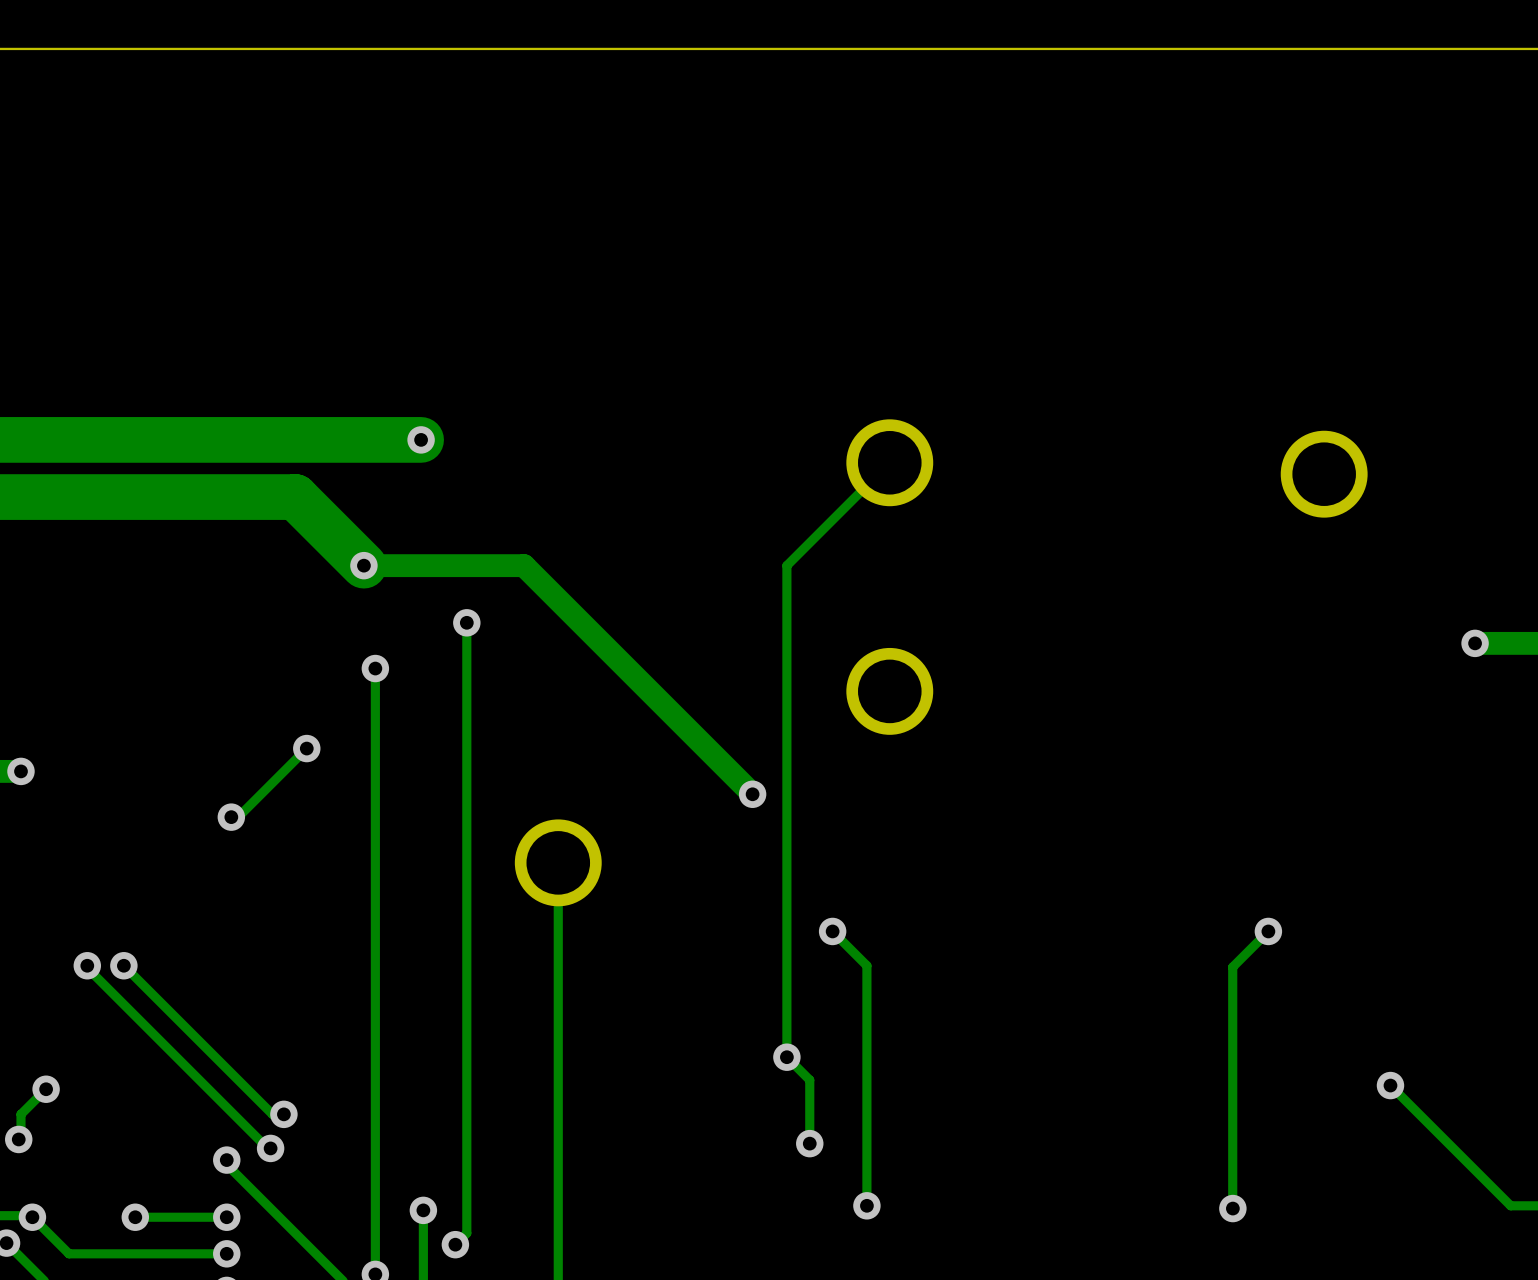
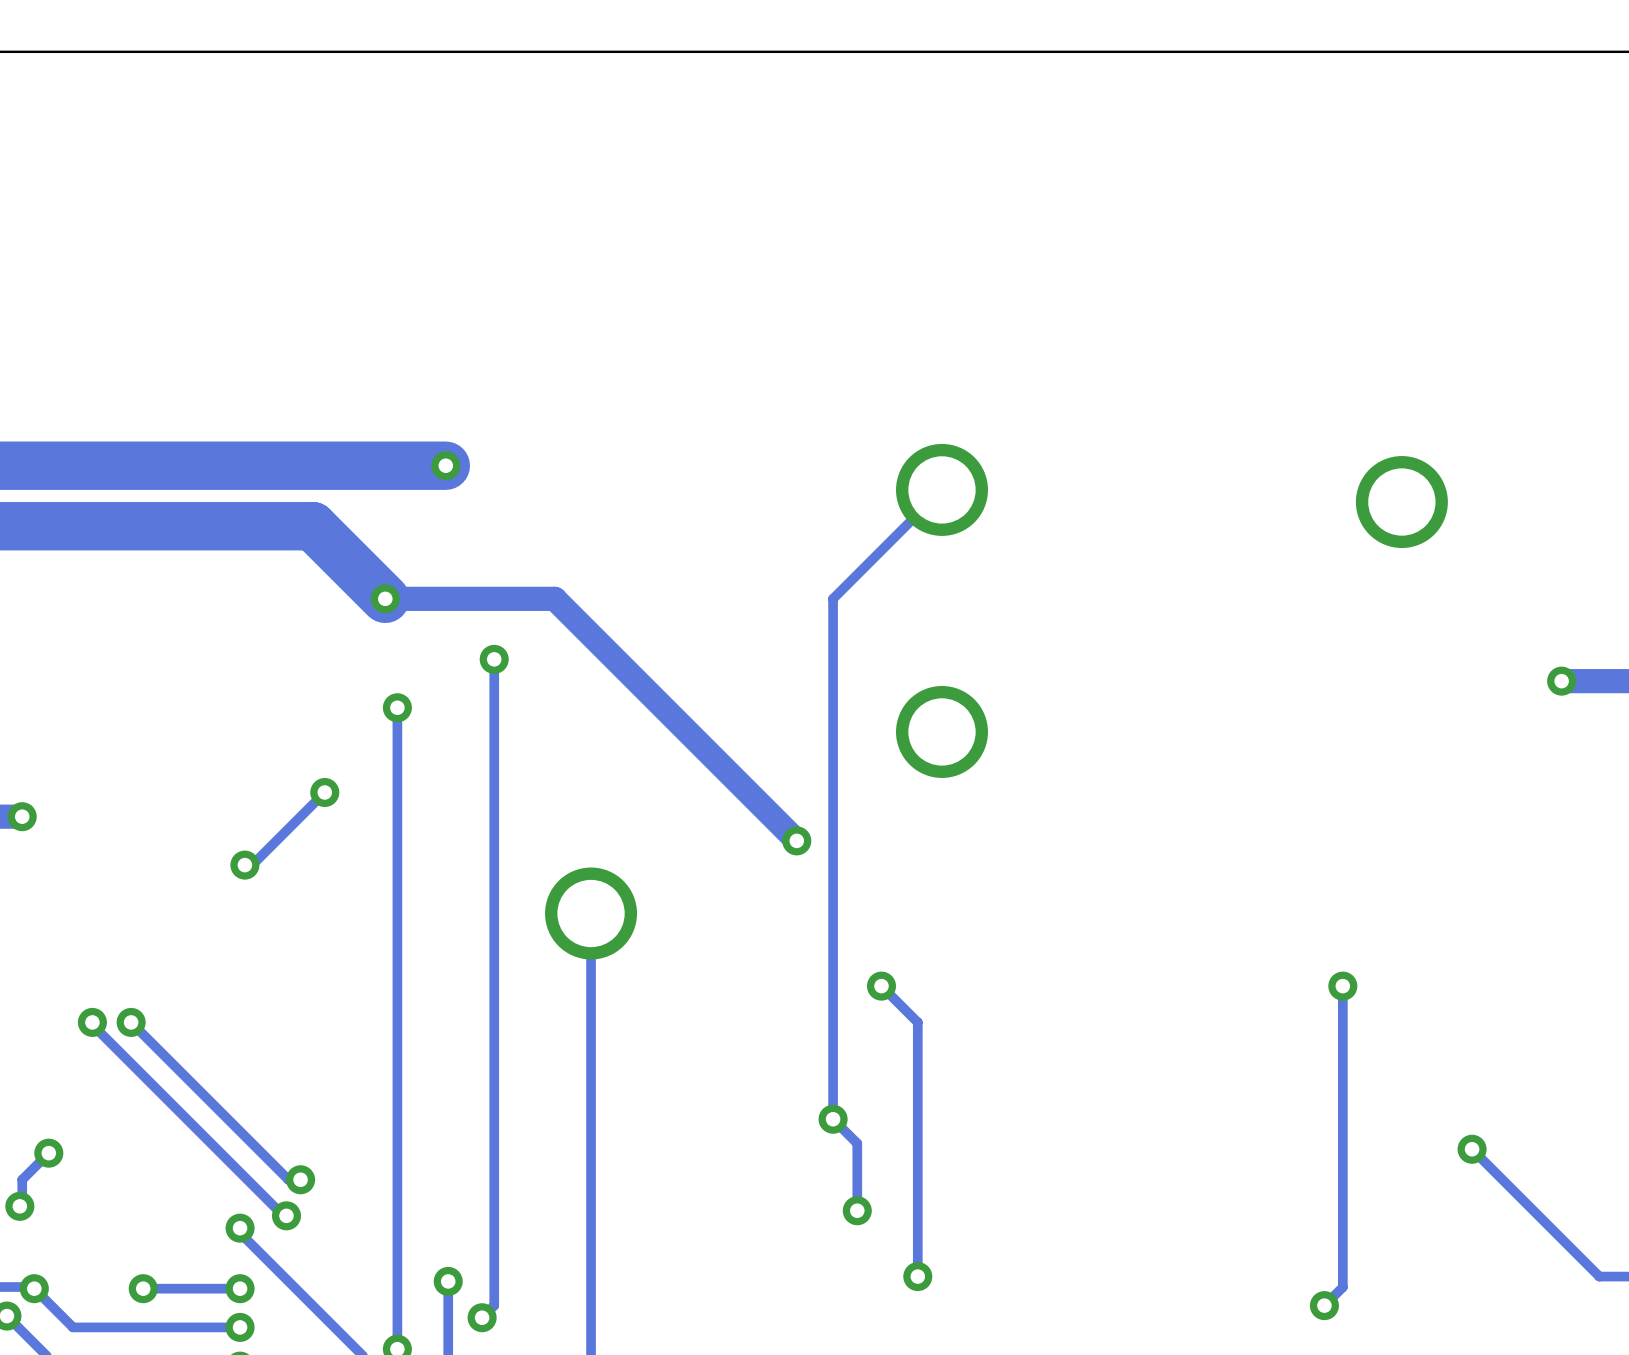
track: (1268, 931) (1232, 967) (1232, 1208) -> (1342, 986) (1342, 1287) (1324, 1305)
via position: (1232, 1208) -> (1324, 1305)

